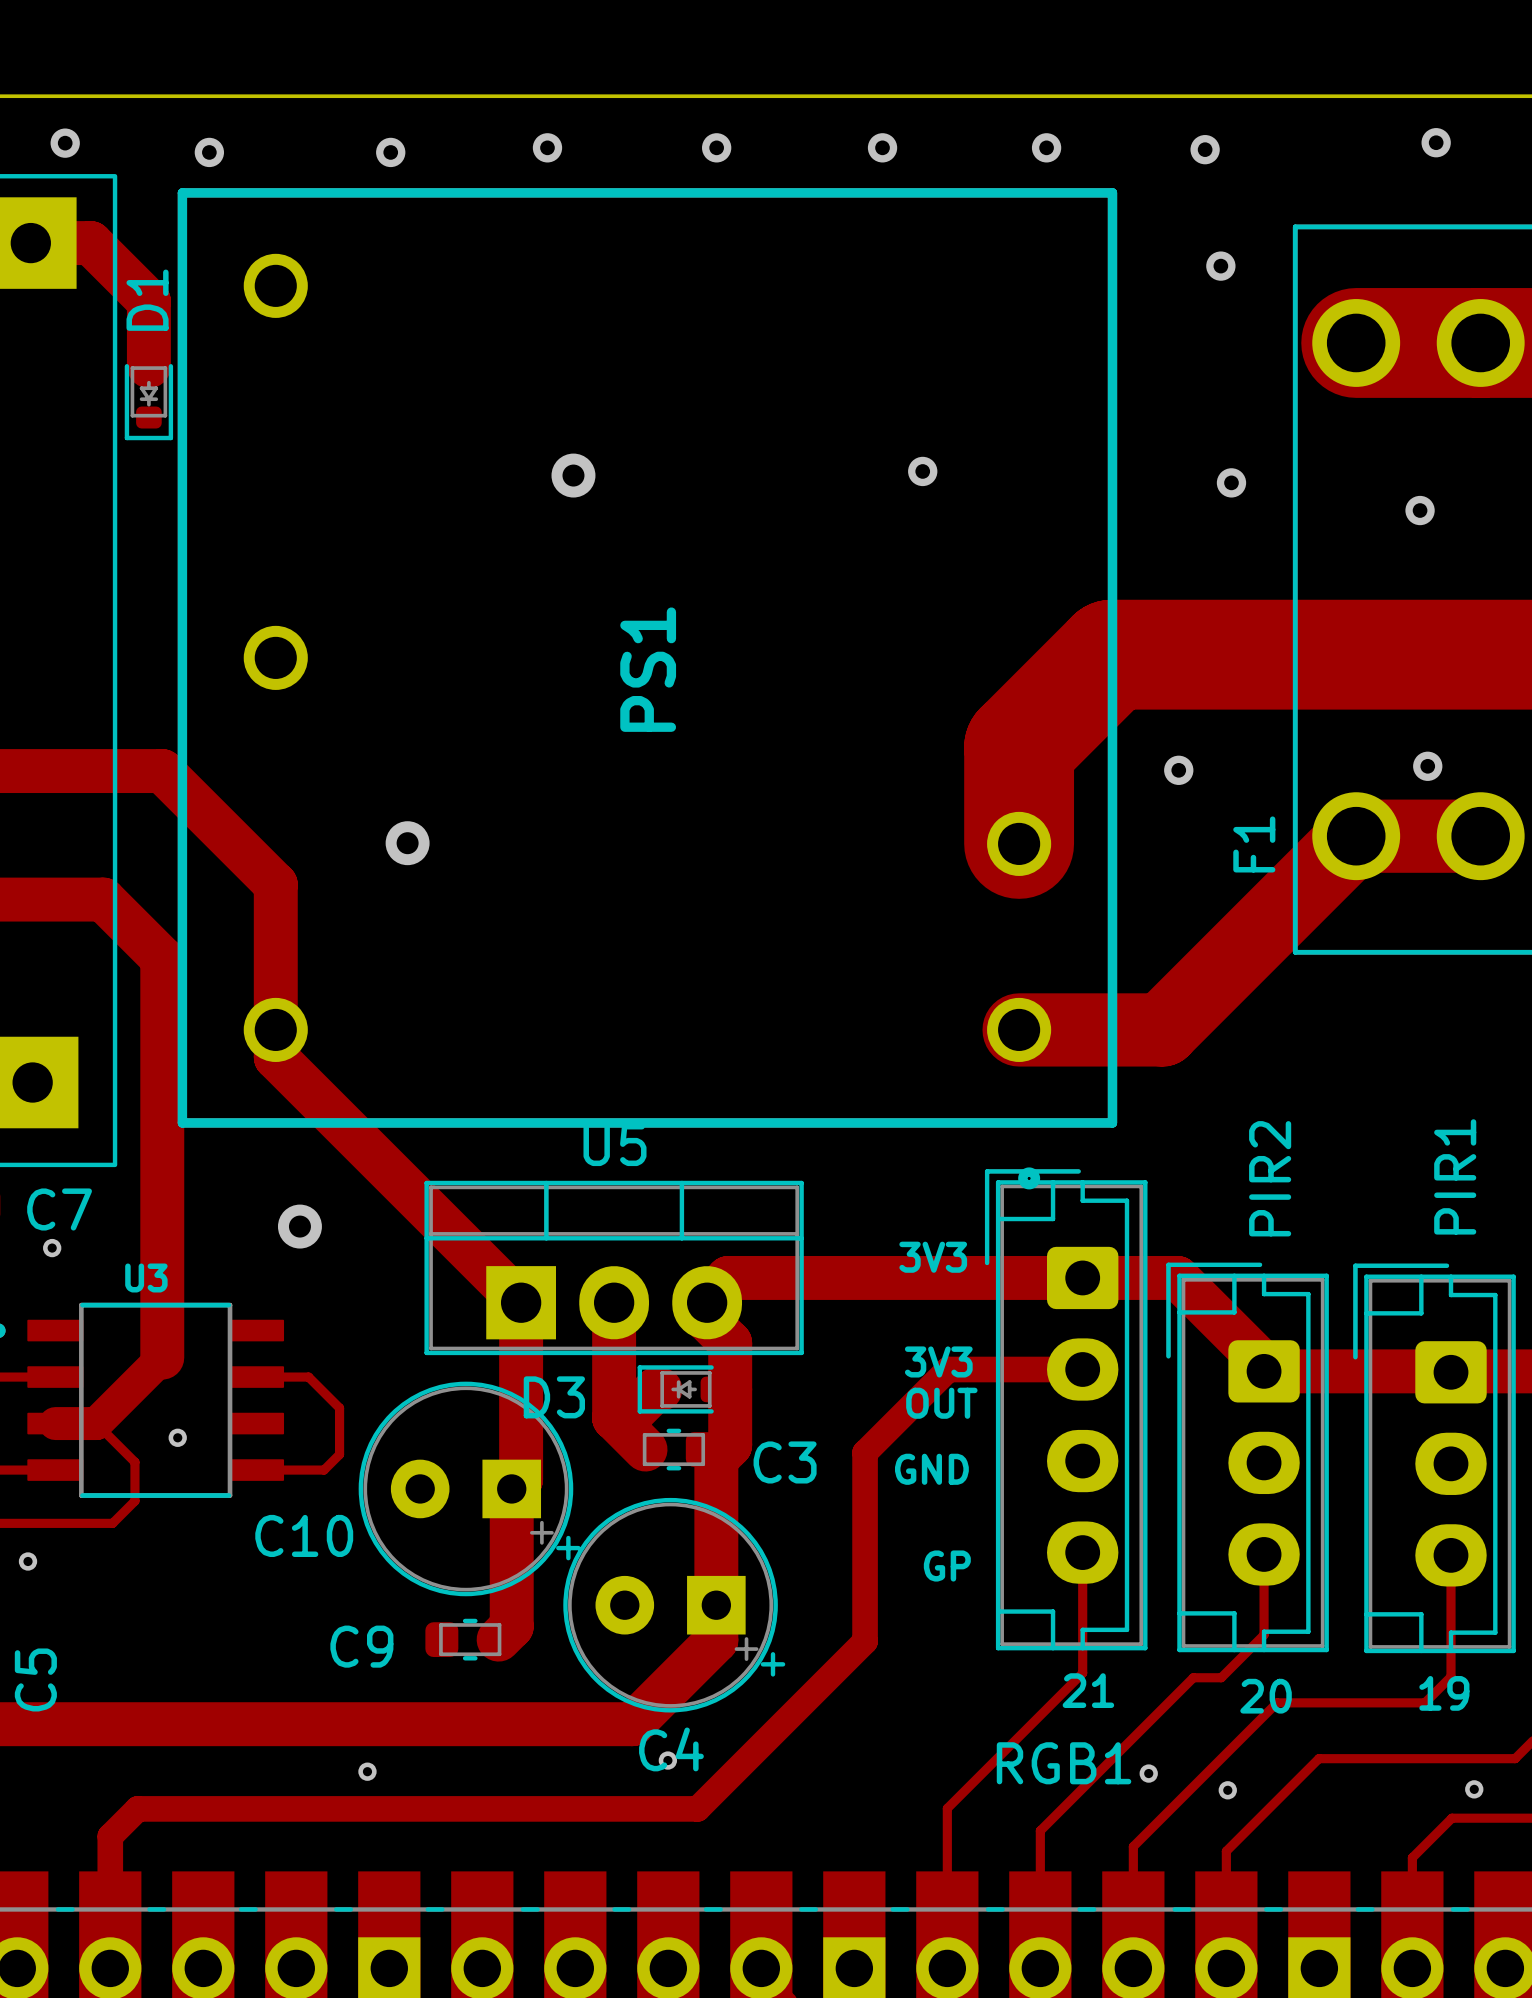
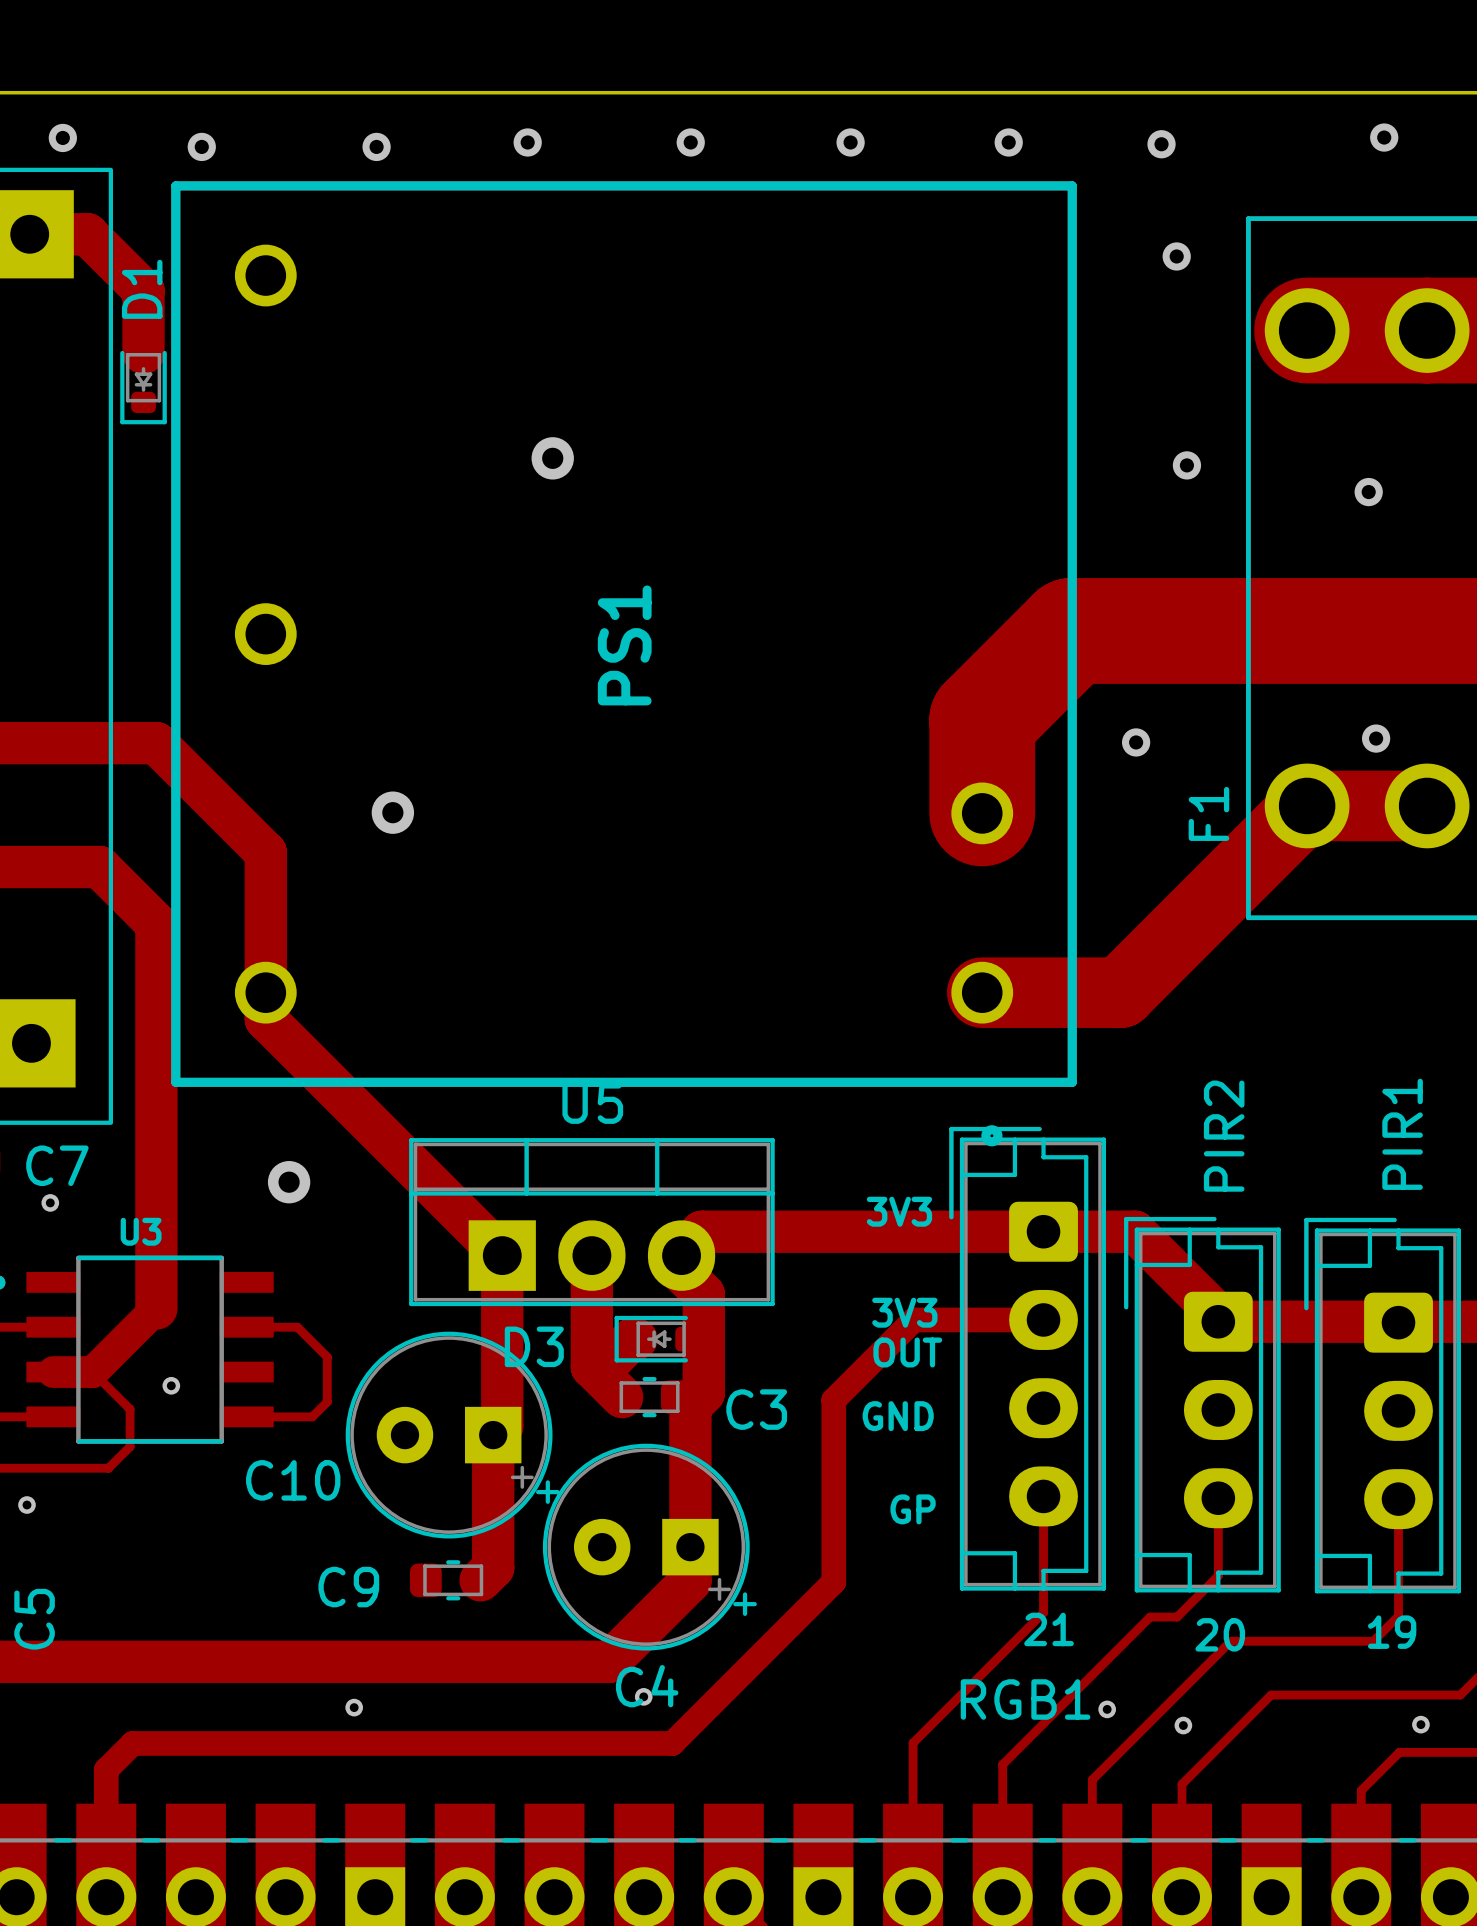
via: (922, 471) -> none

